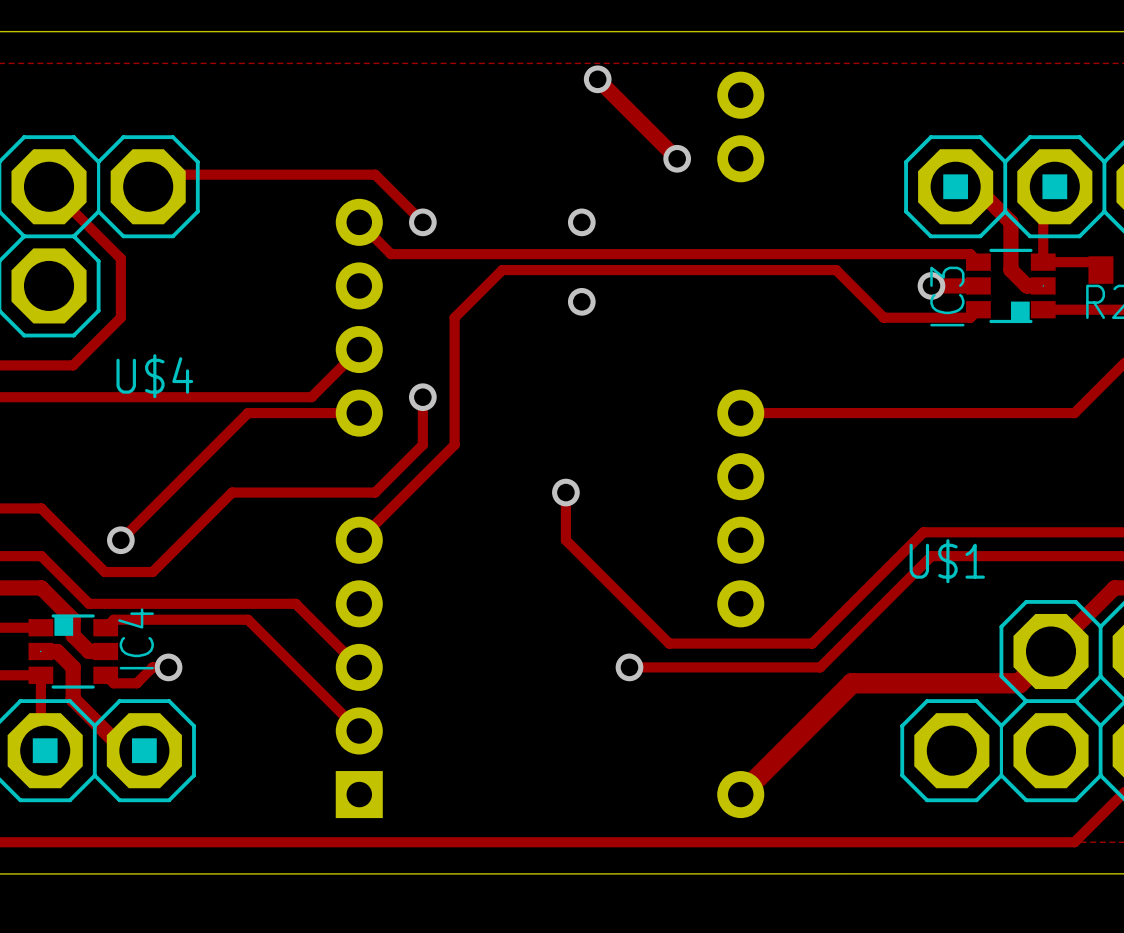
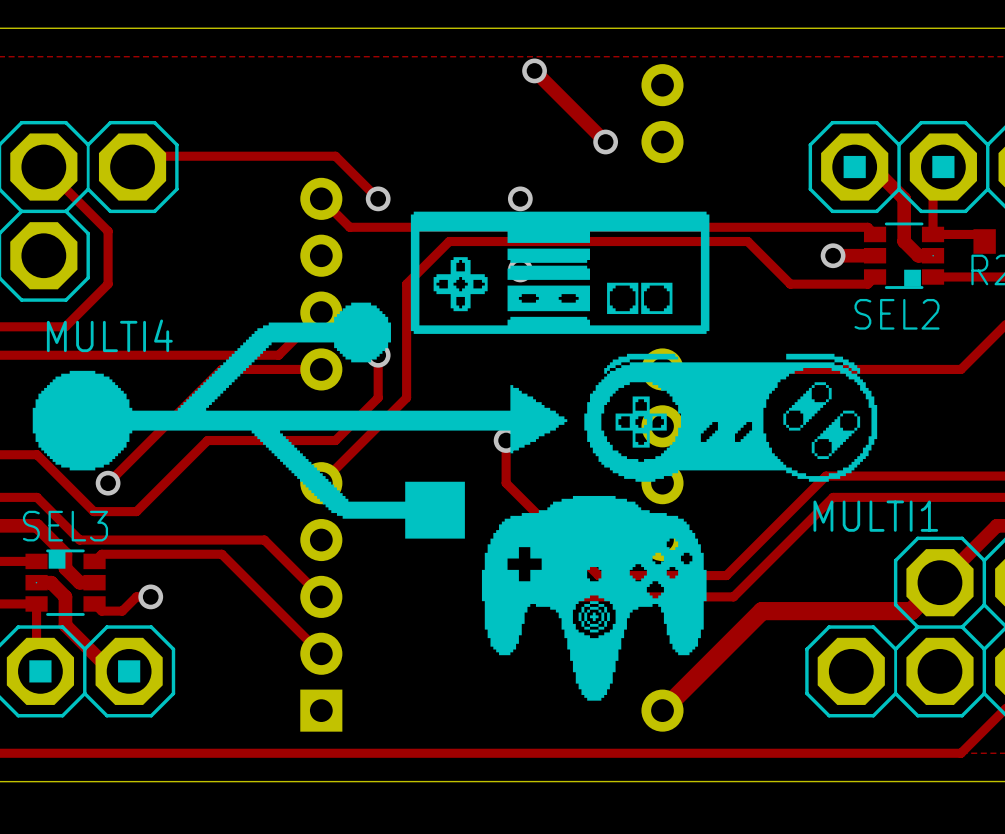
drawing: none -> [32, 211, 878, 701]
IC3 name: IC3 (947, 296) -> SEL2 (897, 314)
U$4 name: U$4 (154, 376) -> MULTI4 (109, 335)
U$1 name: U$1 (947, 561) -> MULTI1 (875, 516)
IC4 name: IC4 (136, 638) -> SEL3 (65, 526)

